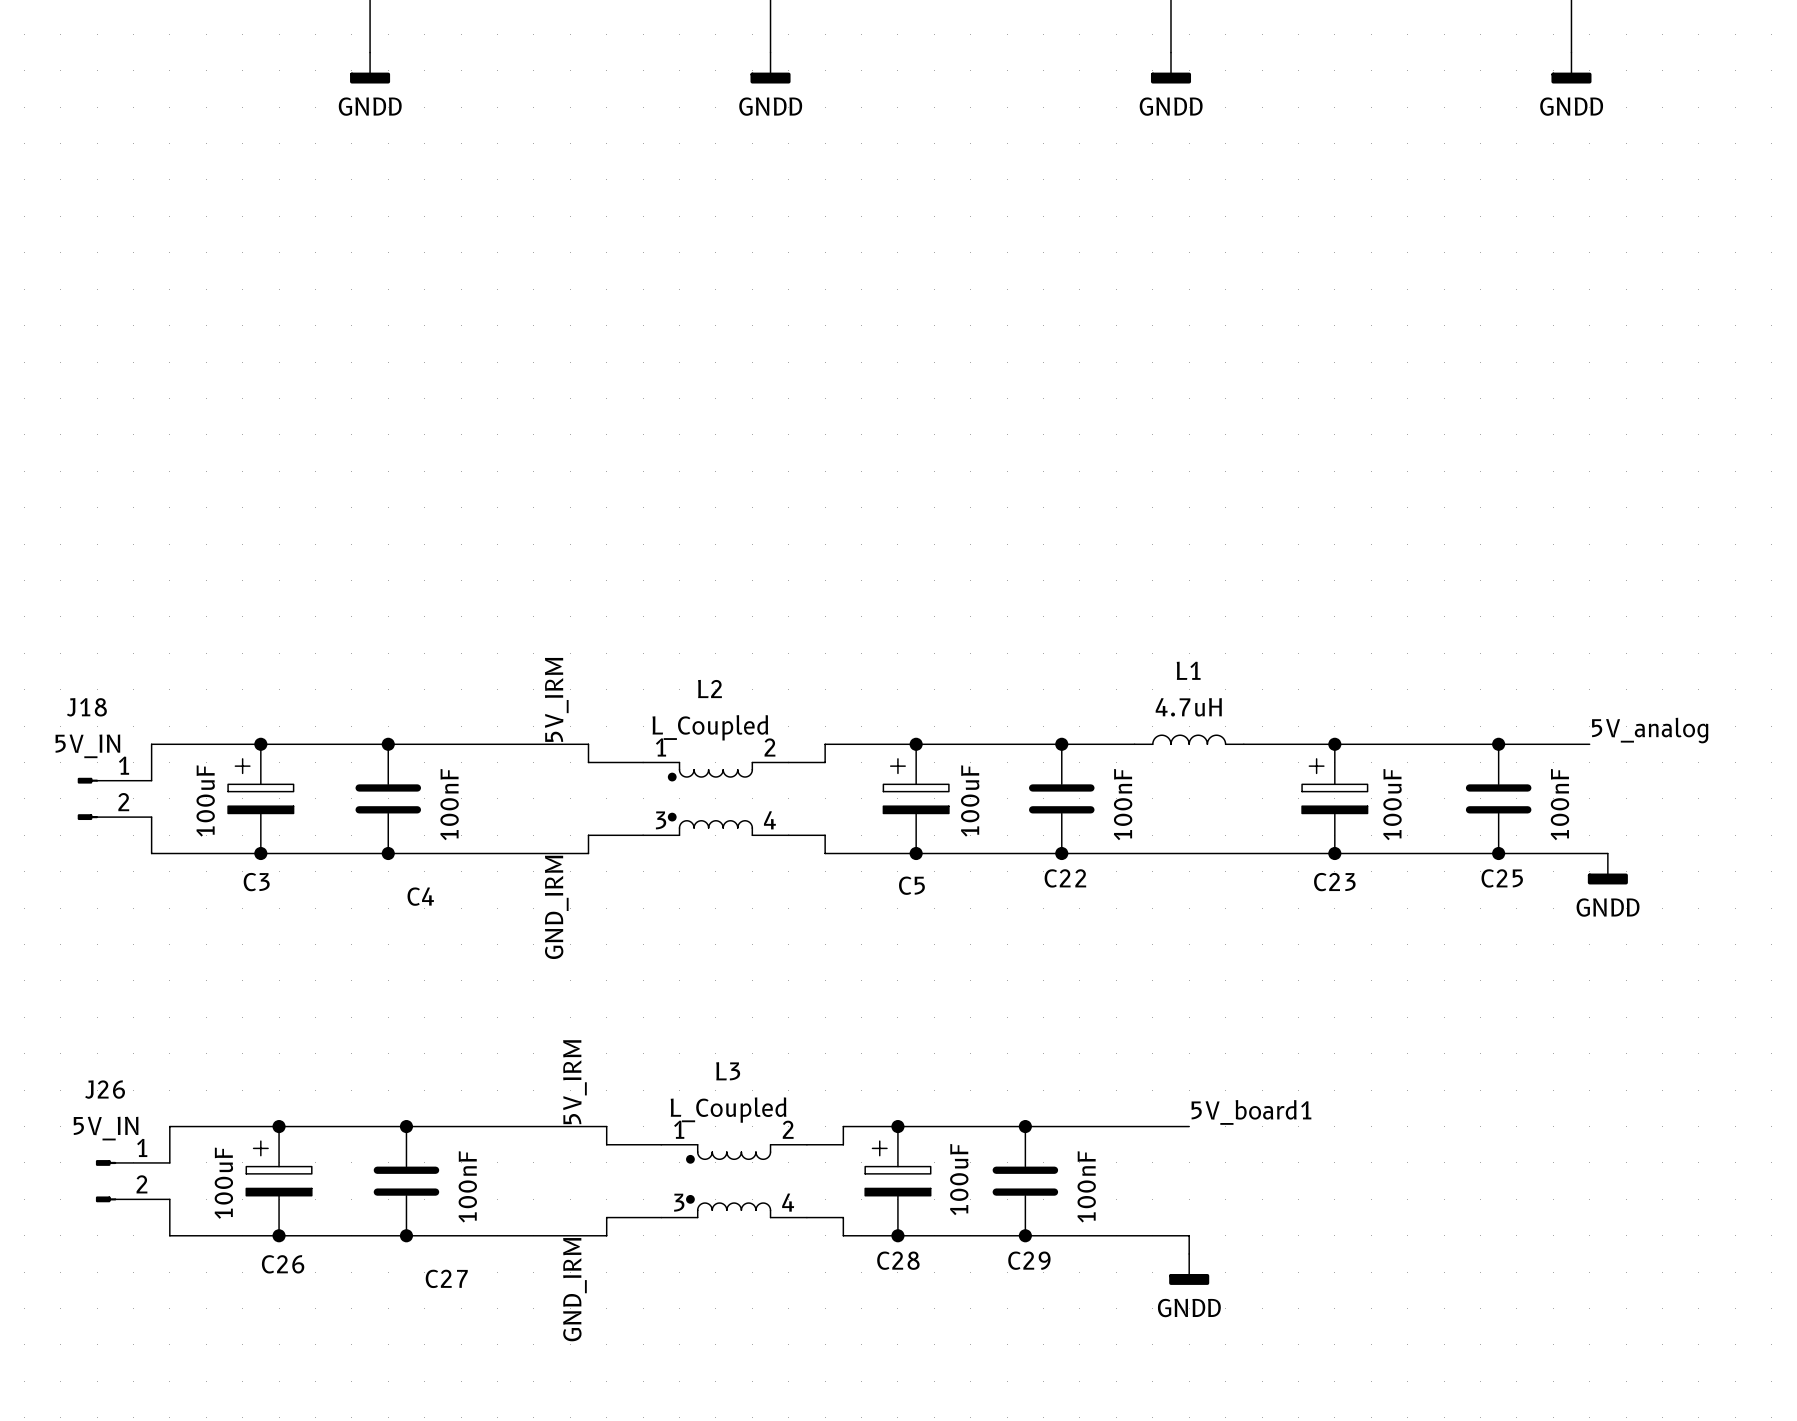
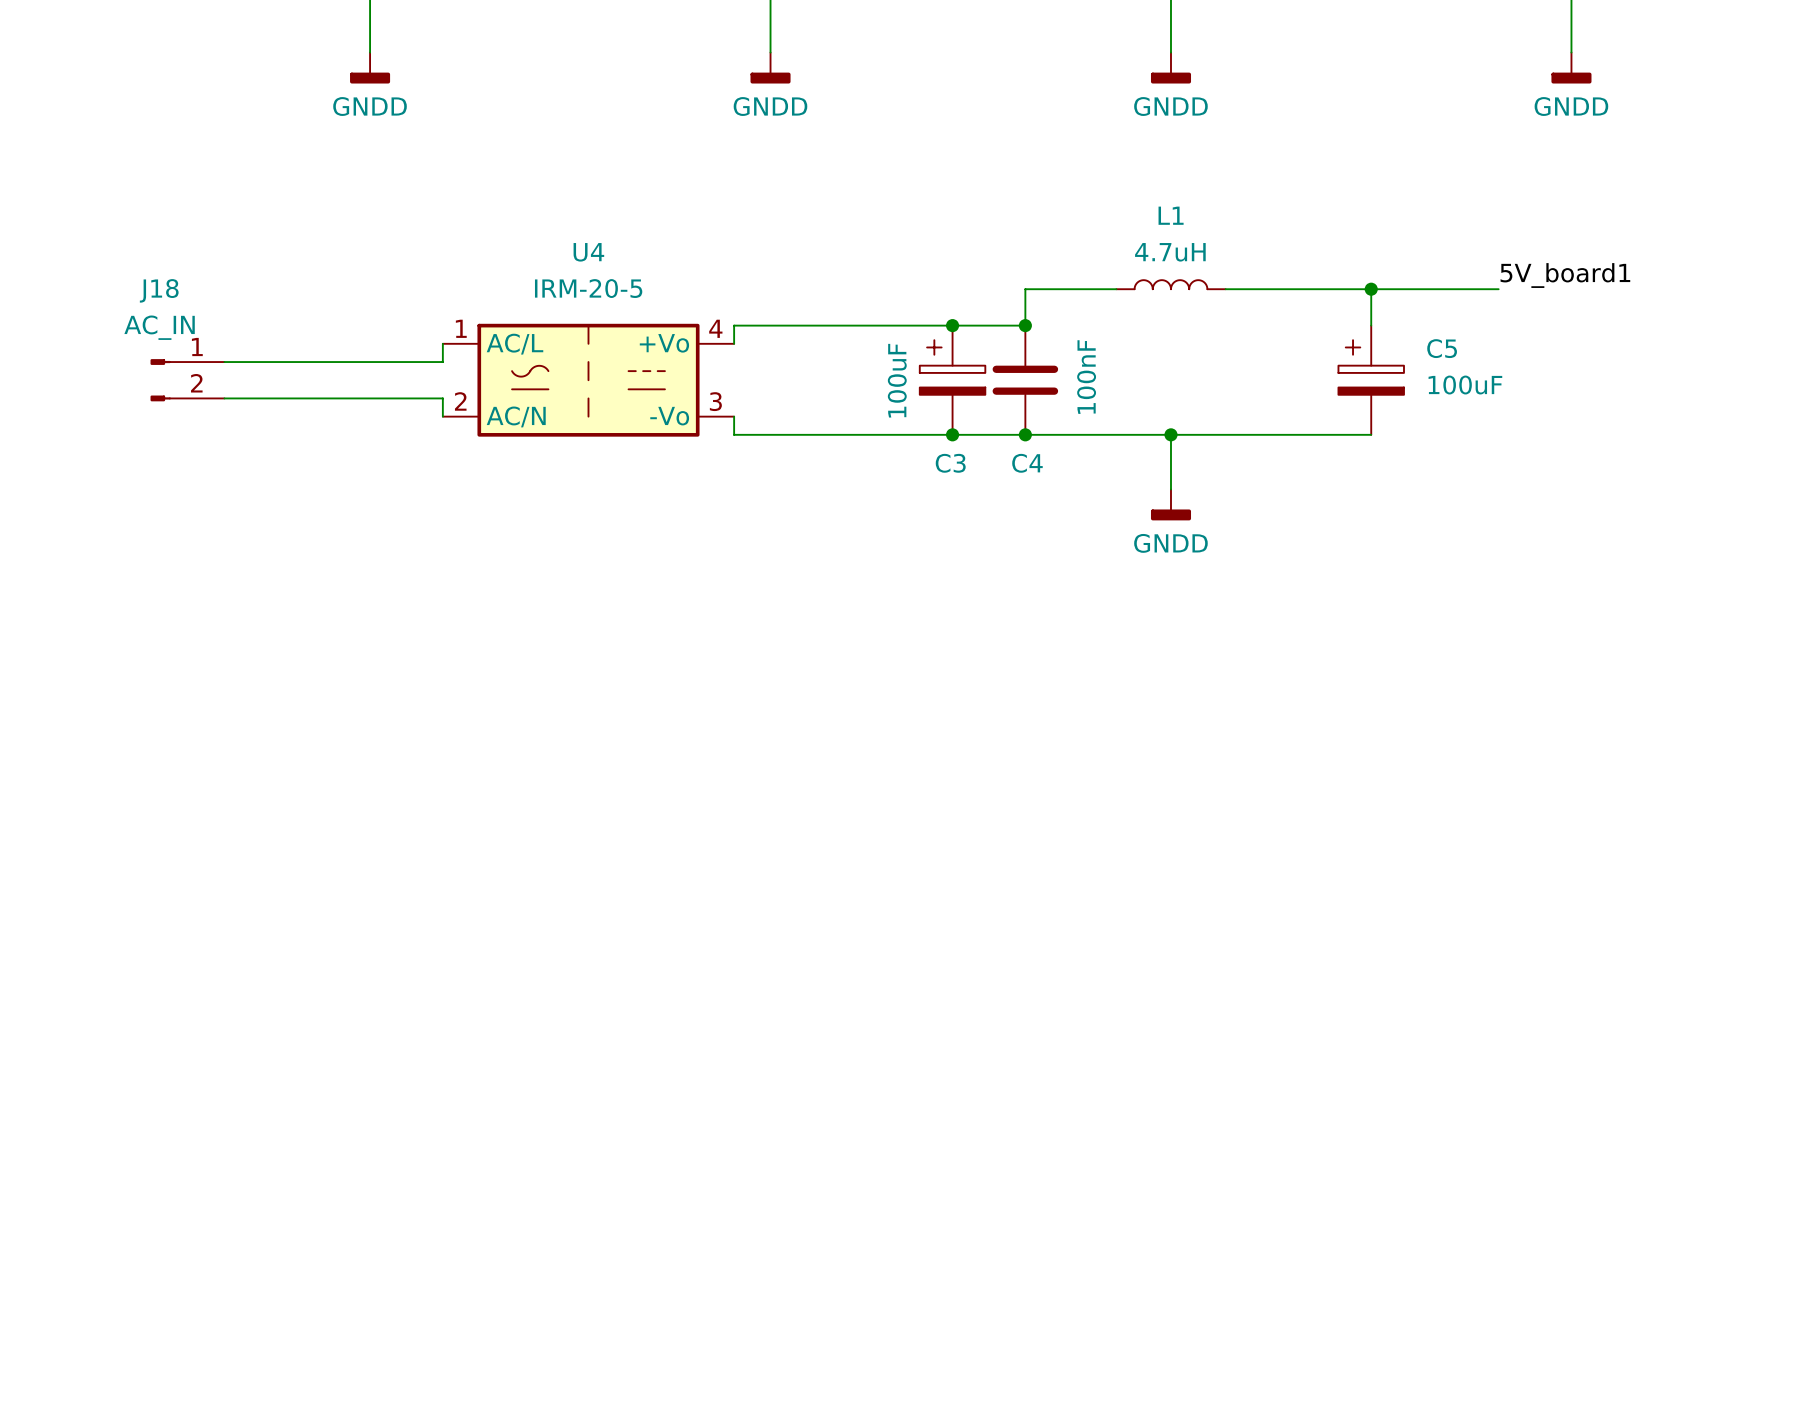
label: none -> 5V_board1 (1565, 275)
wire: none -> (1116, 289) (1025, 289) (1025, 325) (734, 325) (734, 343)
wire: none -> (1225, 289) (1498, 289)
wire: none -> (1371, 289) (1371, 325)
junction: none -> (1371, 289)
junction: none -> (952, 325)
junction: none -> (1025, 325)
wire: none -> (442, 343) (442, 362) (224, 362)
U4: none -> IRM-20-5 (588, 380)
wire: none -> (224, 398) (442, 398) (442, 416)
wire: none -> (734, 416) (734, 434) (1371, 434)
junction: none -> (952, 434)
junction: none -> (1025, 434)
wire: none -> (1170, 434) (1170, 489)
junction: none -> (1170, 434)
power symbol: none -> GNDD (1170, 504)
label: 5V_IRM (556, 699) -> none
label: 5V_analog (1650, 730) -> none
L1 position: (1189, 739) -> (1170, 284)
junction: (260, 744) -> none
junction: (388, 744) -> none
junction: (916, 744) -> none
junction: (1061, 744) -> none
wire: (1134, 744) (825, 744) (825, 762) (788, 762) -> none
wire: (1243, 744) (1589, 744) -> none
junction: (1334, 744) -> none
junction: (1498, 744) -> none
J18 value: 5V_IN (87, 746) -> AC_IN (159, 327)
wire: (643, 762) (588, 762) (588, 744) (151, 744) (151, 780) -> none
J18 position: (114, 798) -> (187, 380)
C3 position: (260, 798) -> (952, 380)
C4 position: (388, 798) -> (1025, 380)
L2: L_Coupled (715, 798) -> none
C5 position: (916, 798) -> (1371, 380)
C22: 100nF (1061, 798) -> none
C23: 100uF (1334, 798) -> none
C25: 100nF (1498, 798) -> none
C5 value rotation: 0° (970, 800) -> 90° clockwise (1465, 385)
C4 value position: 100nF (449, 804) -> 100nF (1086, 377)
wire: (151, 817) (151, 853) (588, 853) (588, 835) (643, 835) -> none
wire: (788, 835) (825, 835) (825, 853) (1607, 853) -> none
junction: (260, 853) -> none
junction: (388, 853) -> none
junction: (916, 853) -> none
junction: (1061, 853) -> none
junction: (1334, 853) -> none
junction: (1498, 853) -> none
power symbol: GNDD (1607, 868) -> none
C5 name position: C5 (911, 885) -> C5 (1442, 348)
C4 name position: C4 (420, 896) -> C4 (1027, 463)
label: GND_IRM (556, 907) -> none
label: 5V_IRM (574, 1082) -> none
label: 5V_board1 (1251, 1112) -> none
junction: (279, 1126) -> none
junction: (406, 1126) -> none
junction: (897, 1126) -> none
junction: (1025, 1126) -> none
wire: (1189, 1126) (843, 1126) (843, 1144) (806, 1144) -> none
wire: (661, 1144) (606, 1144) (606, 1126) (169, 1126) (169, 1162) -> none
J26: 5V_IN (132, 1181) -> none
C26: 100uF (279, 1181) -> none
C27: 100nF (406, 1181) -> none
L3: L_Coupled (734, 1181) -> none
C28: 100uF (897, 1181) -> none
C29: 100nF (1025, 1181) -> none
wire: (169, 1199) (169, 1235) (606, 1235) (606, 1217) (661, 1217) -> none
wire: (806, 1217) (843, 1217) (843, 1235) (1189, 1235) (1189, 1253) -> none
junction: (279, 1235) -> none
junction: (406, 1235) -> none
junction: (897, 1235) -> none
junction: (1025, 1235) -> none
power symbol: GNDD (1189, 1269) -> none
label: GND_IRM (574, 1289) -> none

